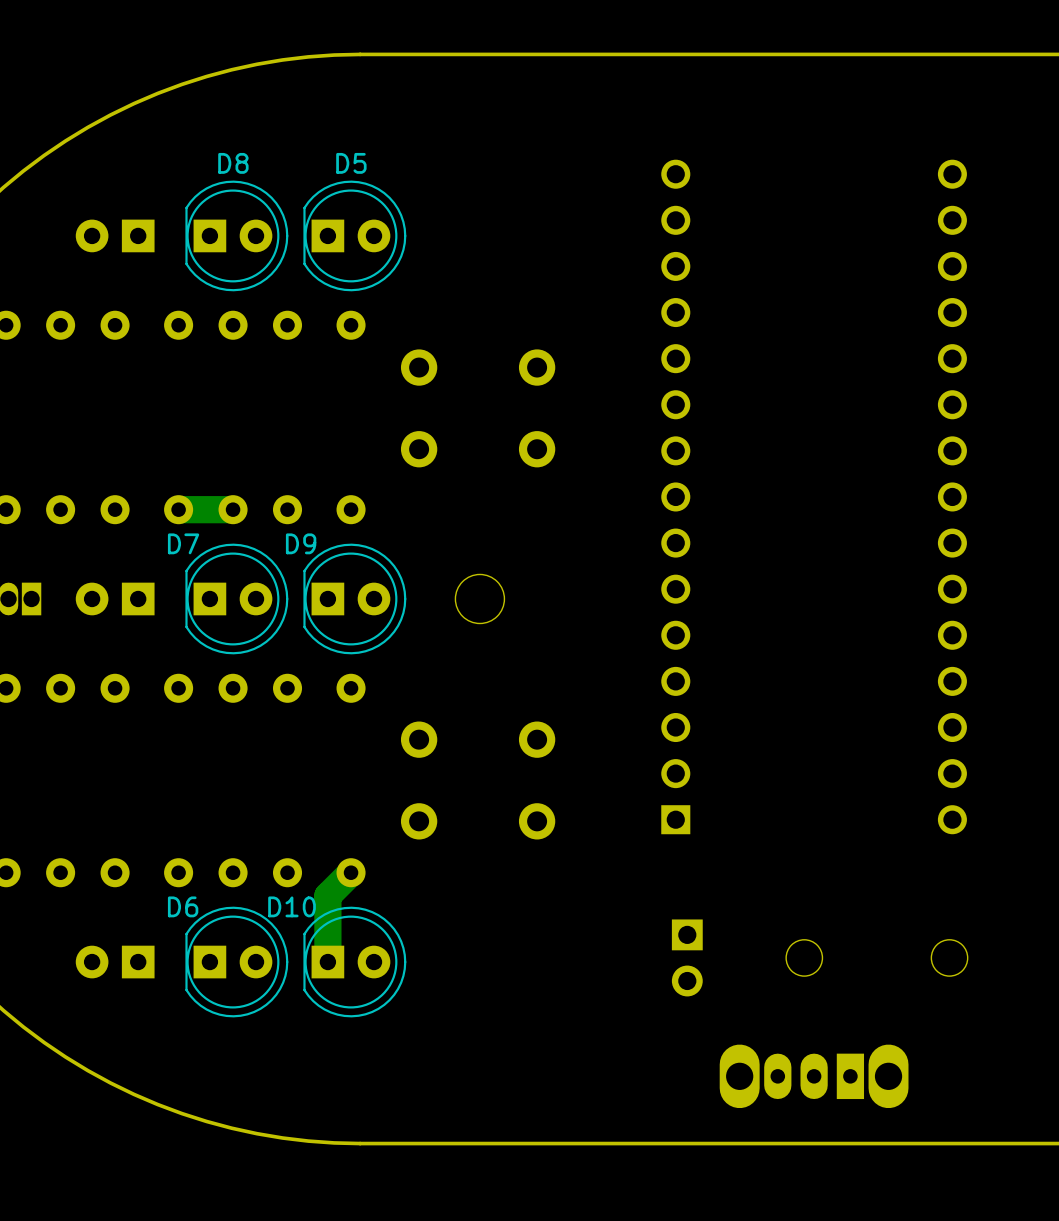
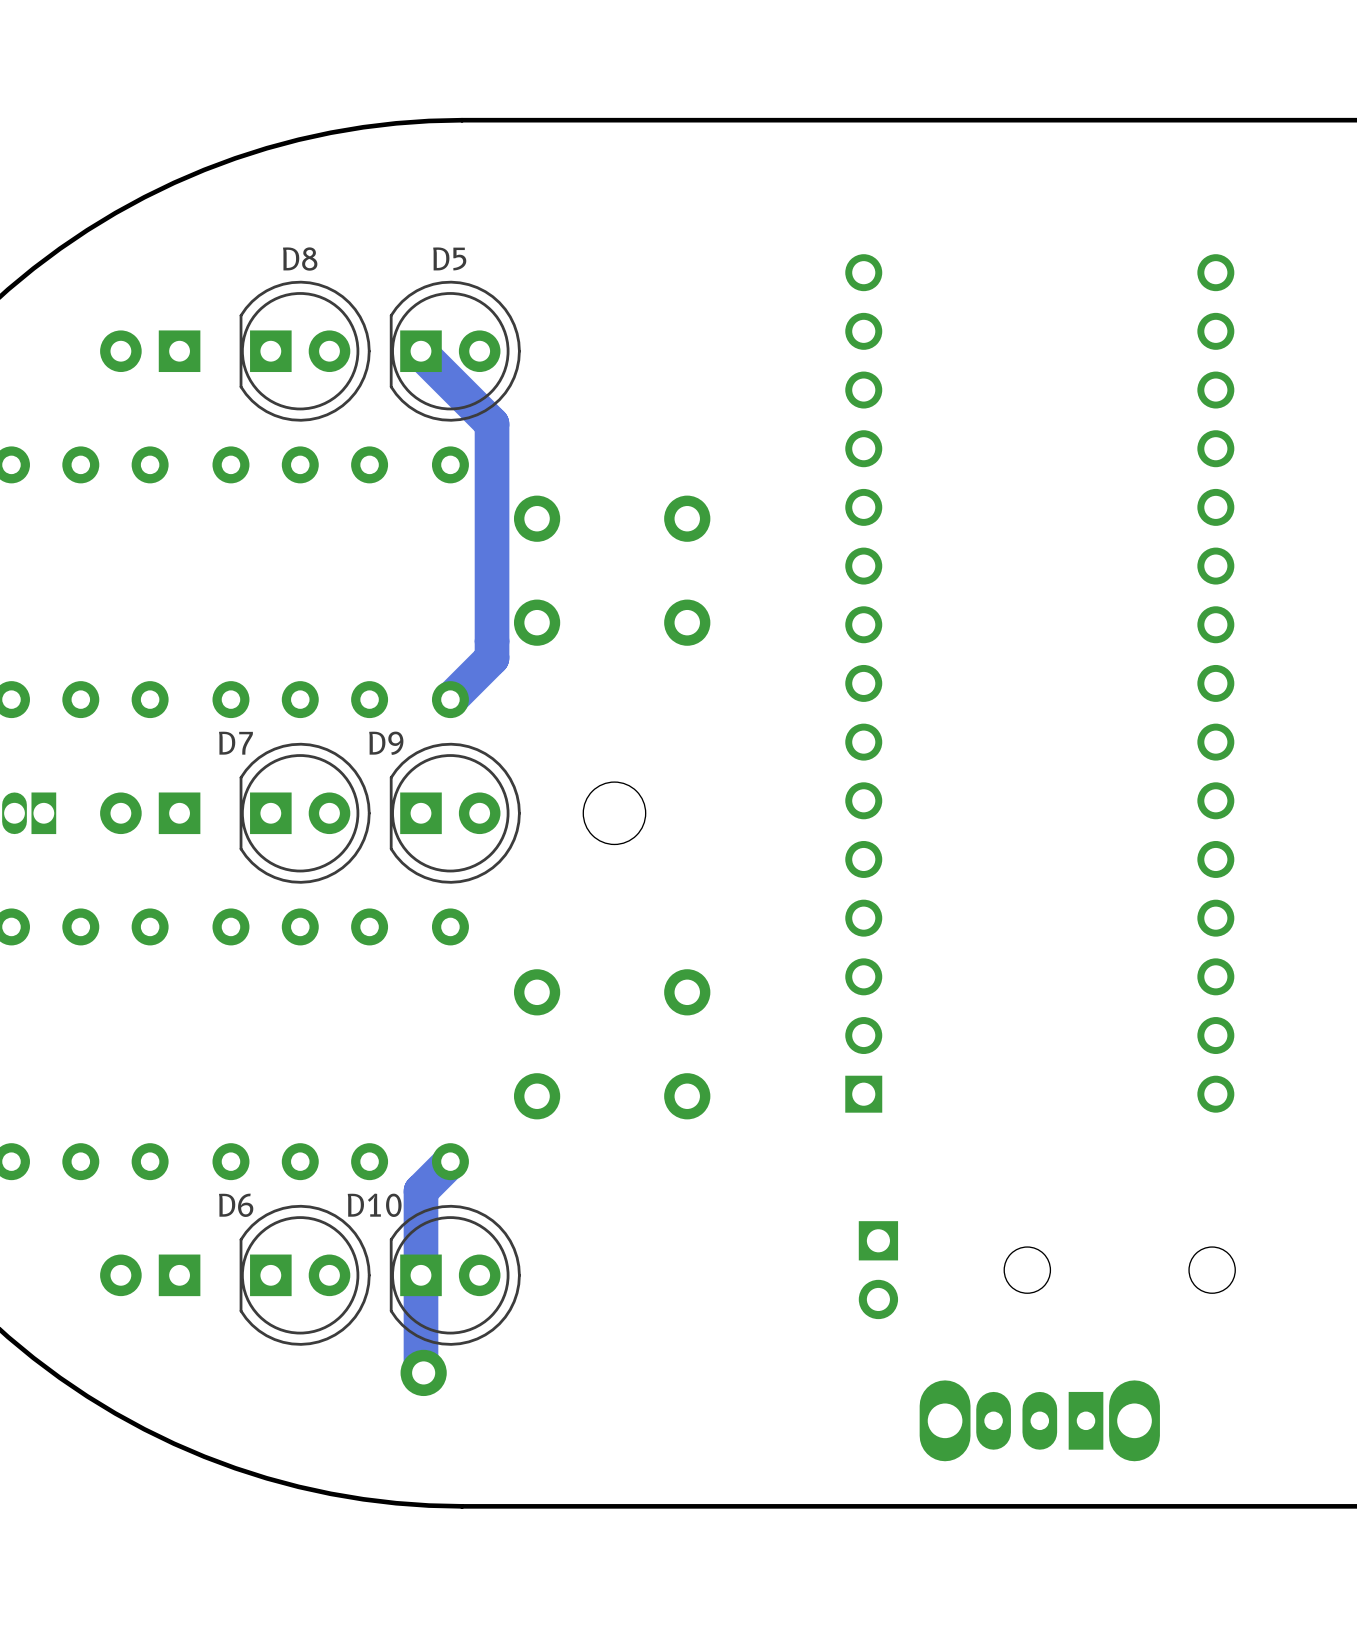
track: none -> (420, 351) (492, 424) (492, 658) (450, 699)
track: (233, 509) (178, 509) -> none
track: none -> (420, 1275) (420, 1370) (423, 1372)
via: none -> (423, 1372)

